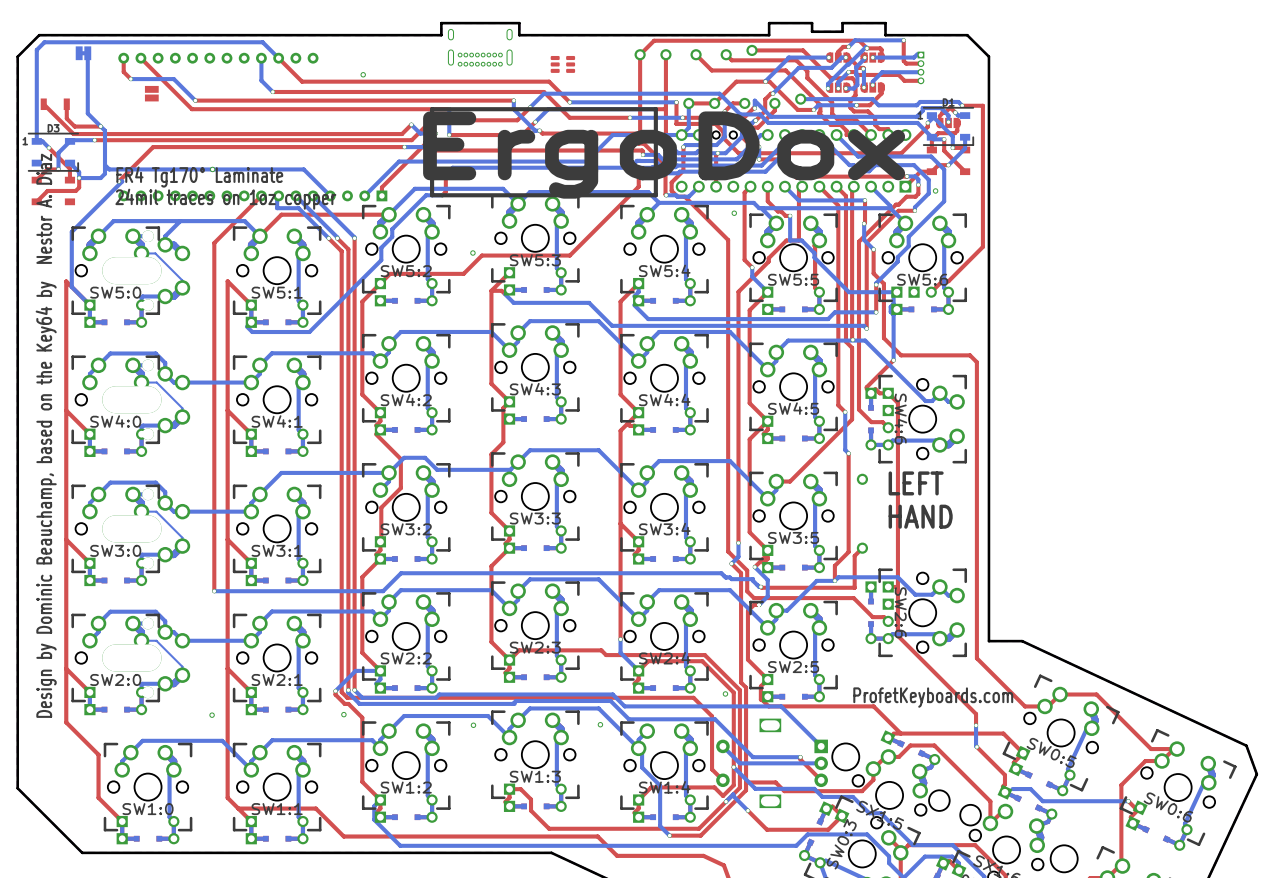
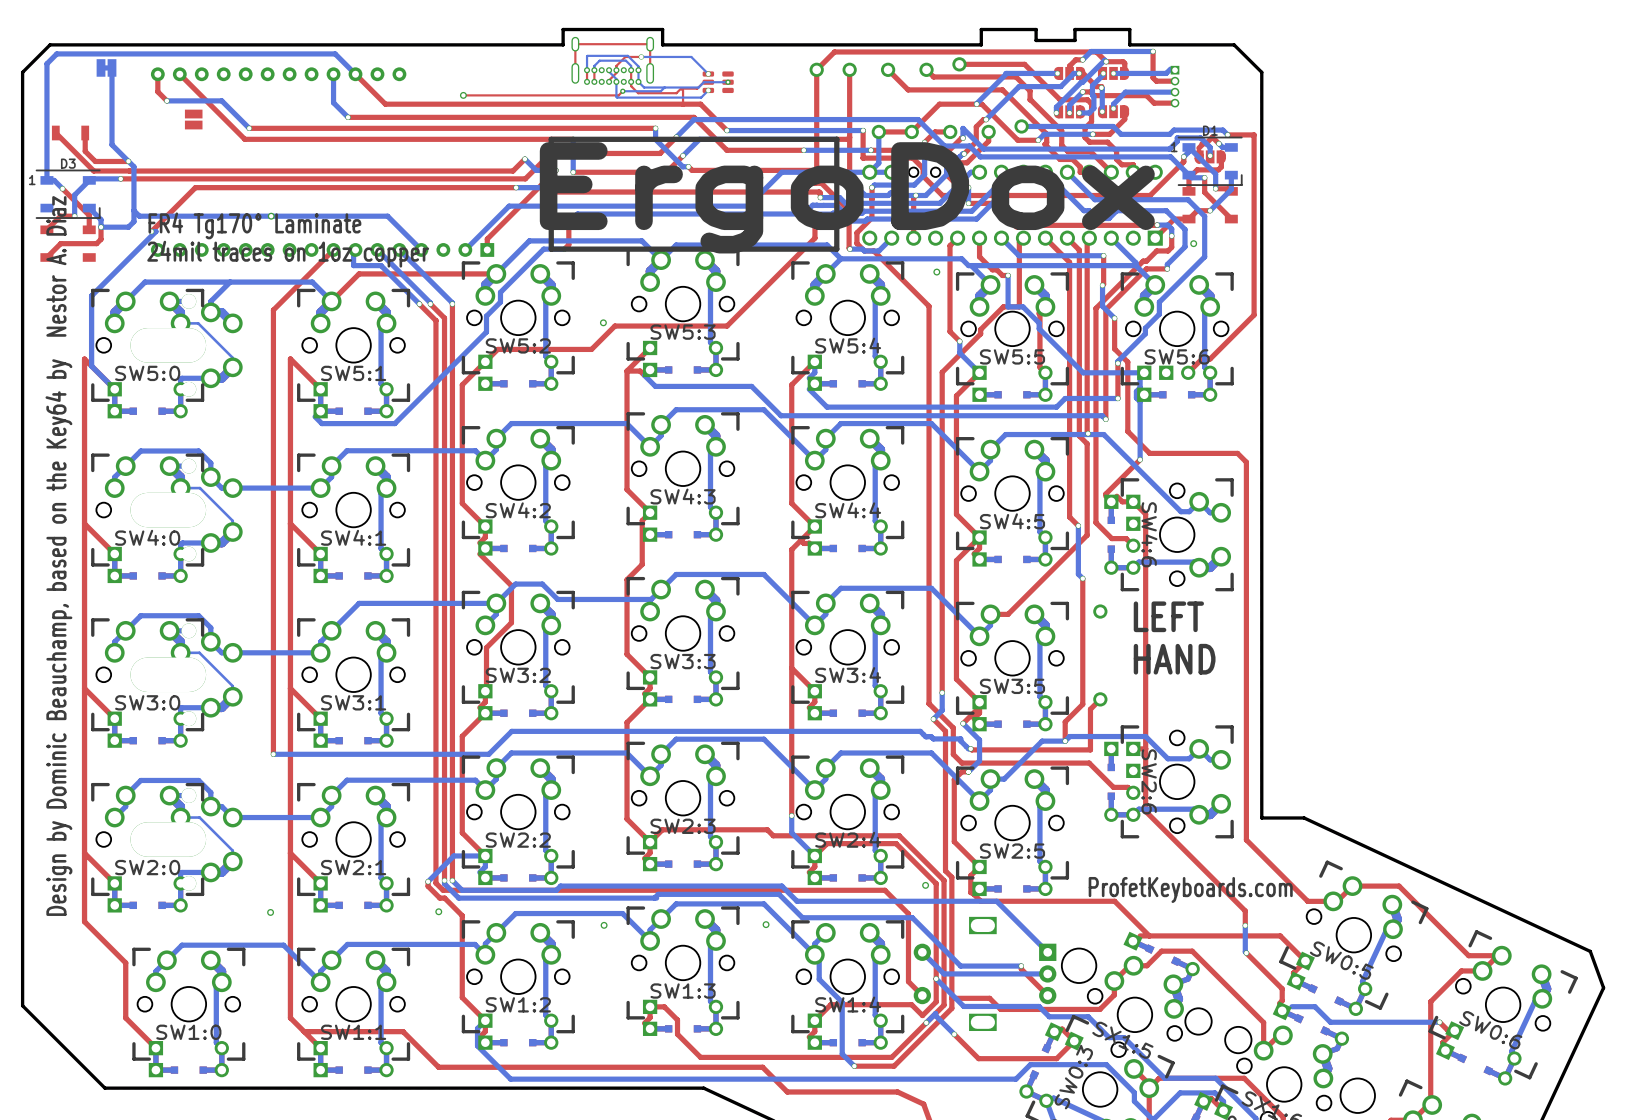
top track: none -> (641, 56) (625, 56) (616, 65) (616, 73) (609, 81)
bottom track: none -> (641, 56) (691, 56) (708, 74)
via: none -> (641, 56)
top track: none -> (587, 70) (587, 81)
bottom track: none -> (587, 70) (587, 55) (627, 55) (638, 66) (638, 81) (644, 87) (698, 87) (703, 82) (728, 82)
top track: none -> (594, 70) (594, 81)
bottom track: none -> (609, 70) (616, 79) (617, 97) (701, 97) (708, 90)
top track: none -> (631, 70) (631, 86) (638, 93) (676, 93) (681, 88)
bottom track: none -> (631, 70) (631, 65) (625, 60) (599, 60) (594, 65) (594, 70)
top track: none -> (650, 73) (650, 44) (575, 44) (575, 73)
via: none -> (708, 74)
top track: none -> (708, 82) (703, 82) (697, 88) (681, 88)
via: none -> (728, 82)
bottom track: none -> (664, 87) (660, 91) (622, 91)
top track: none -> (681, 88) (683, 90) (683, 104)
via: none -> (708, 90)
top track: none -> (622, 91) (618, 95) (463, 95)
via: none -> (622, 91)

